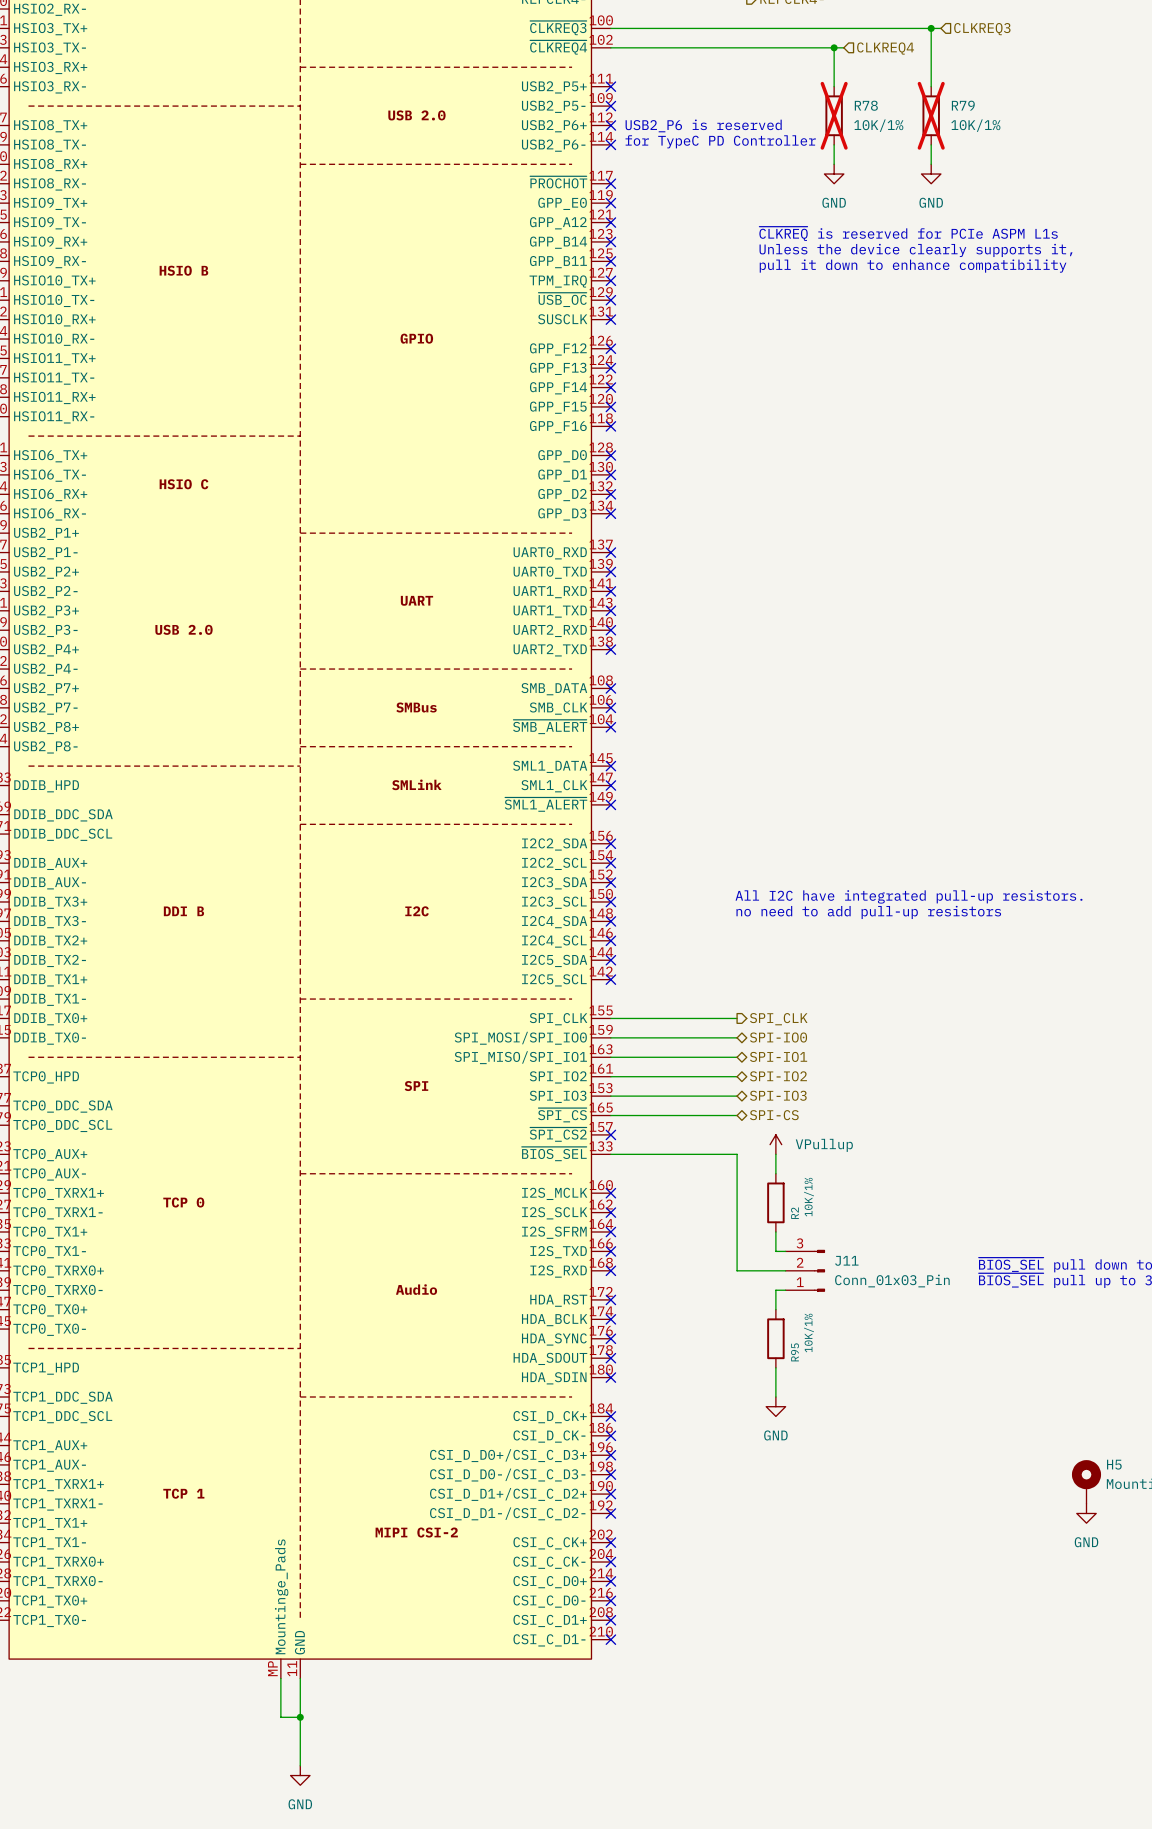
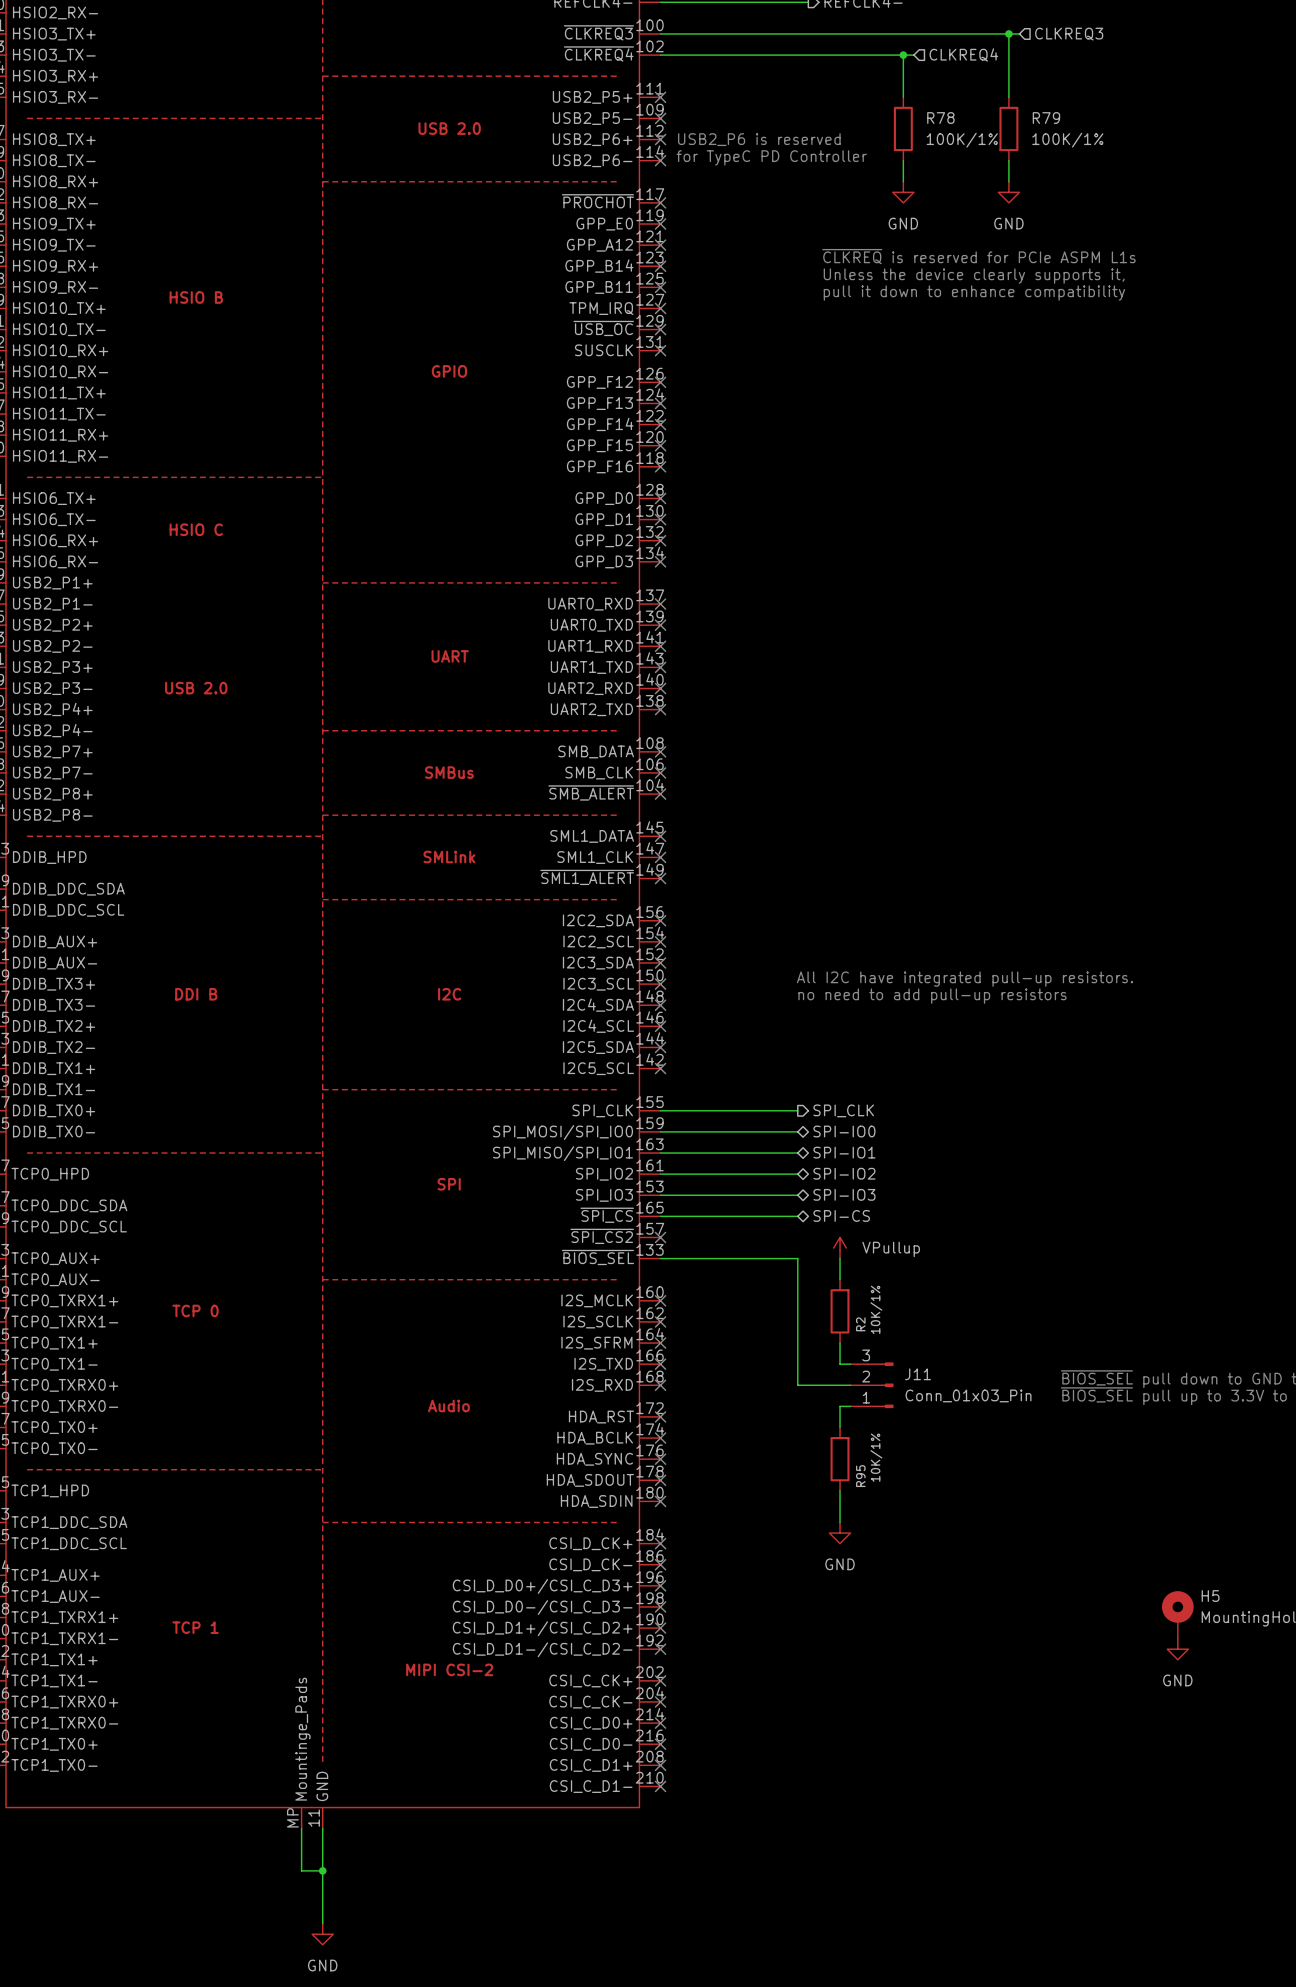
R78 do-not-place cross: (834, 115) -> none
R79 do-not-place cross: (931, 115) -> none
R78 value: 10K/1% (878, 125) -> 100K/1% (962, 140)
R79 value: 10K/1% (975, 125) -> 100K/1% (1067, 140)

